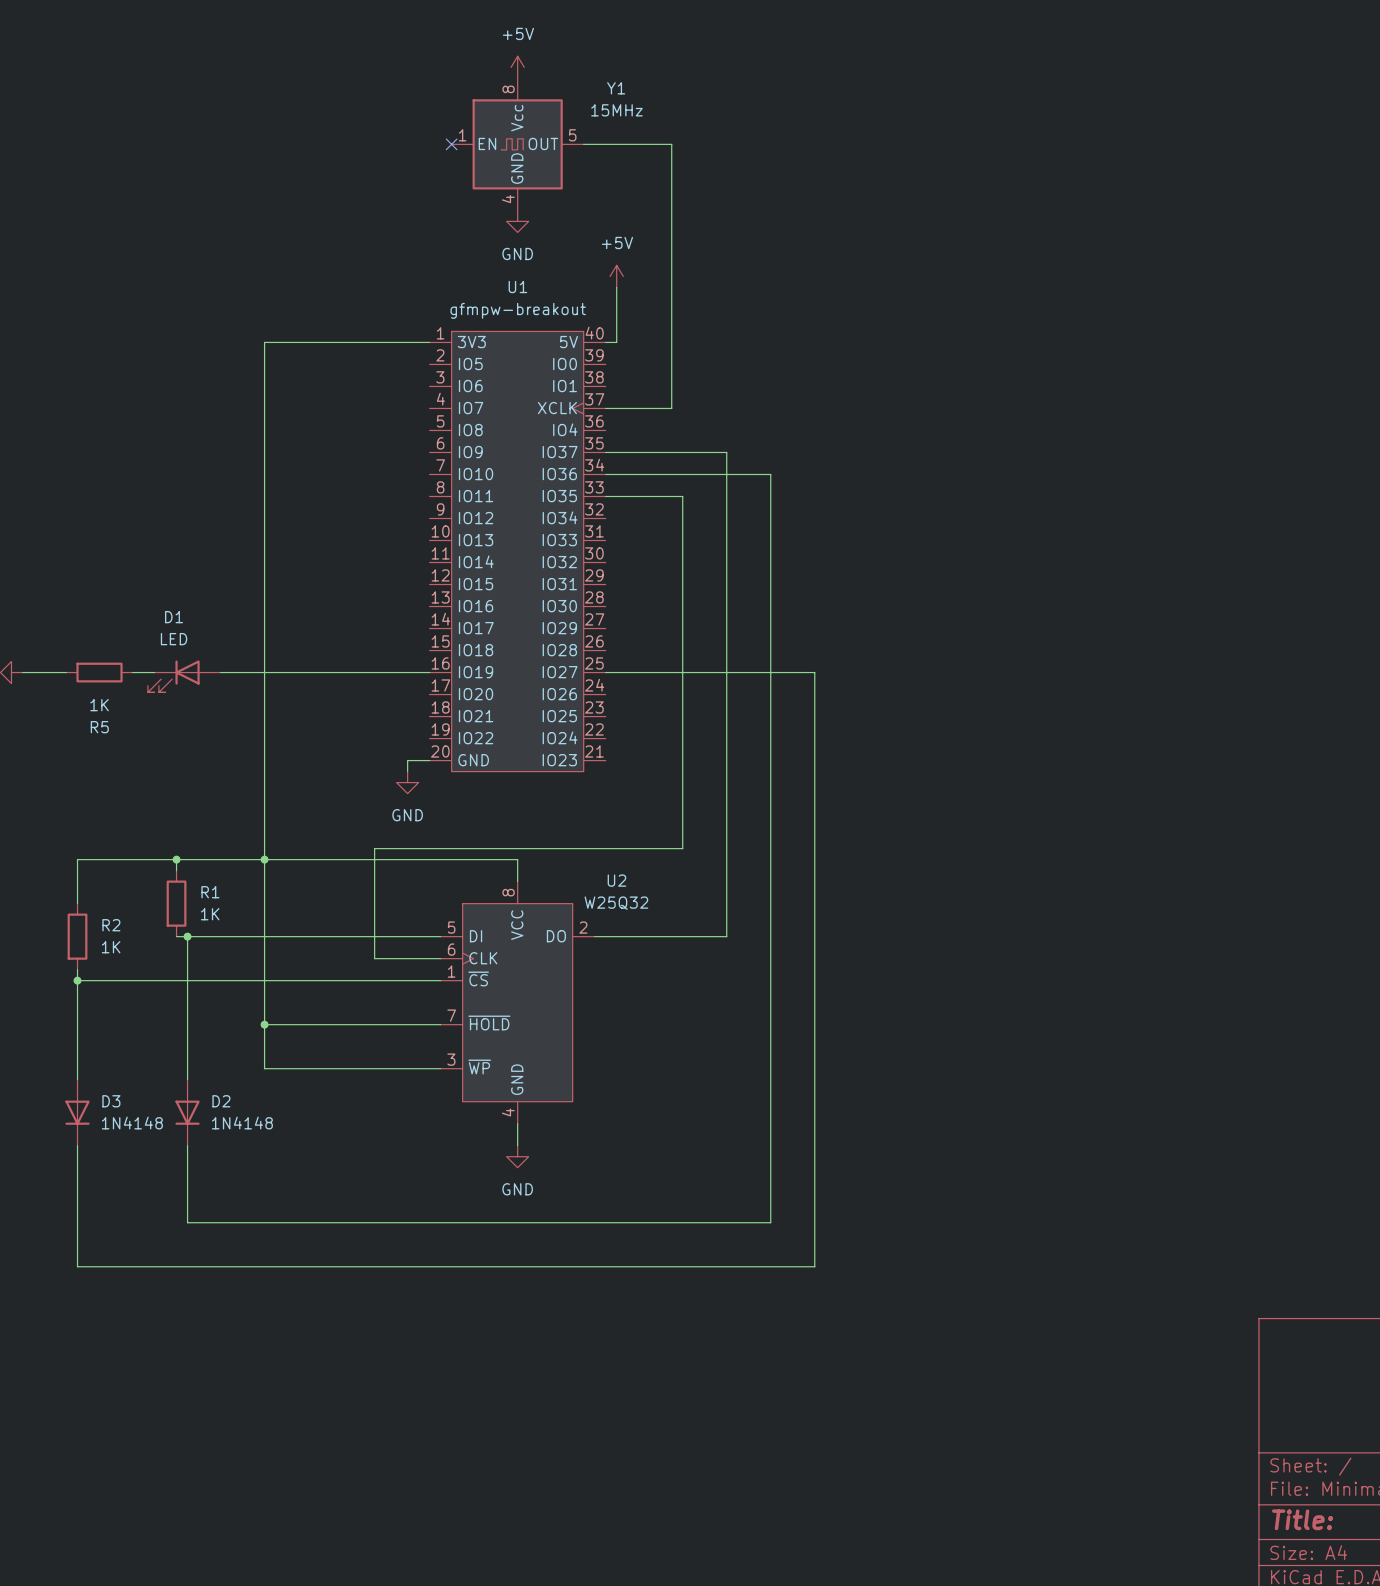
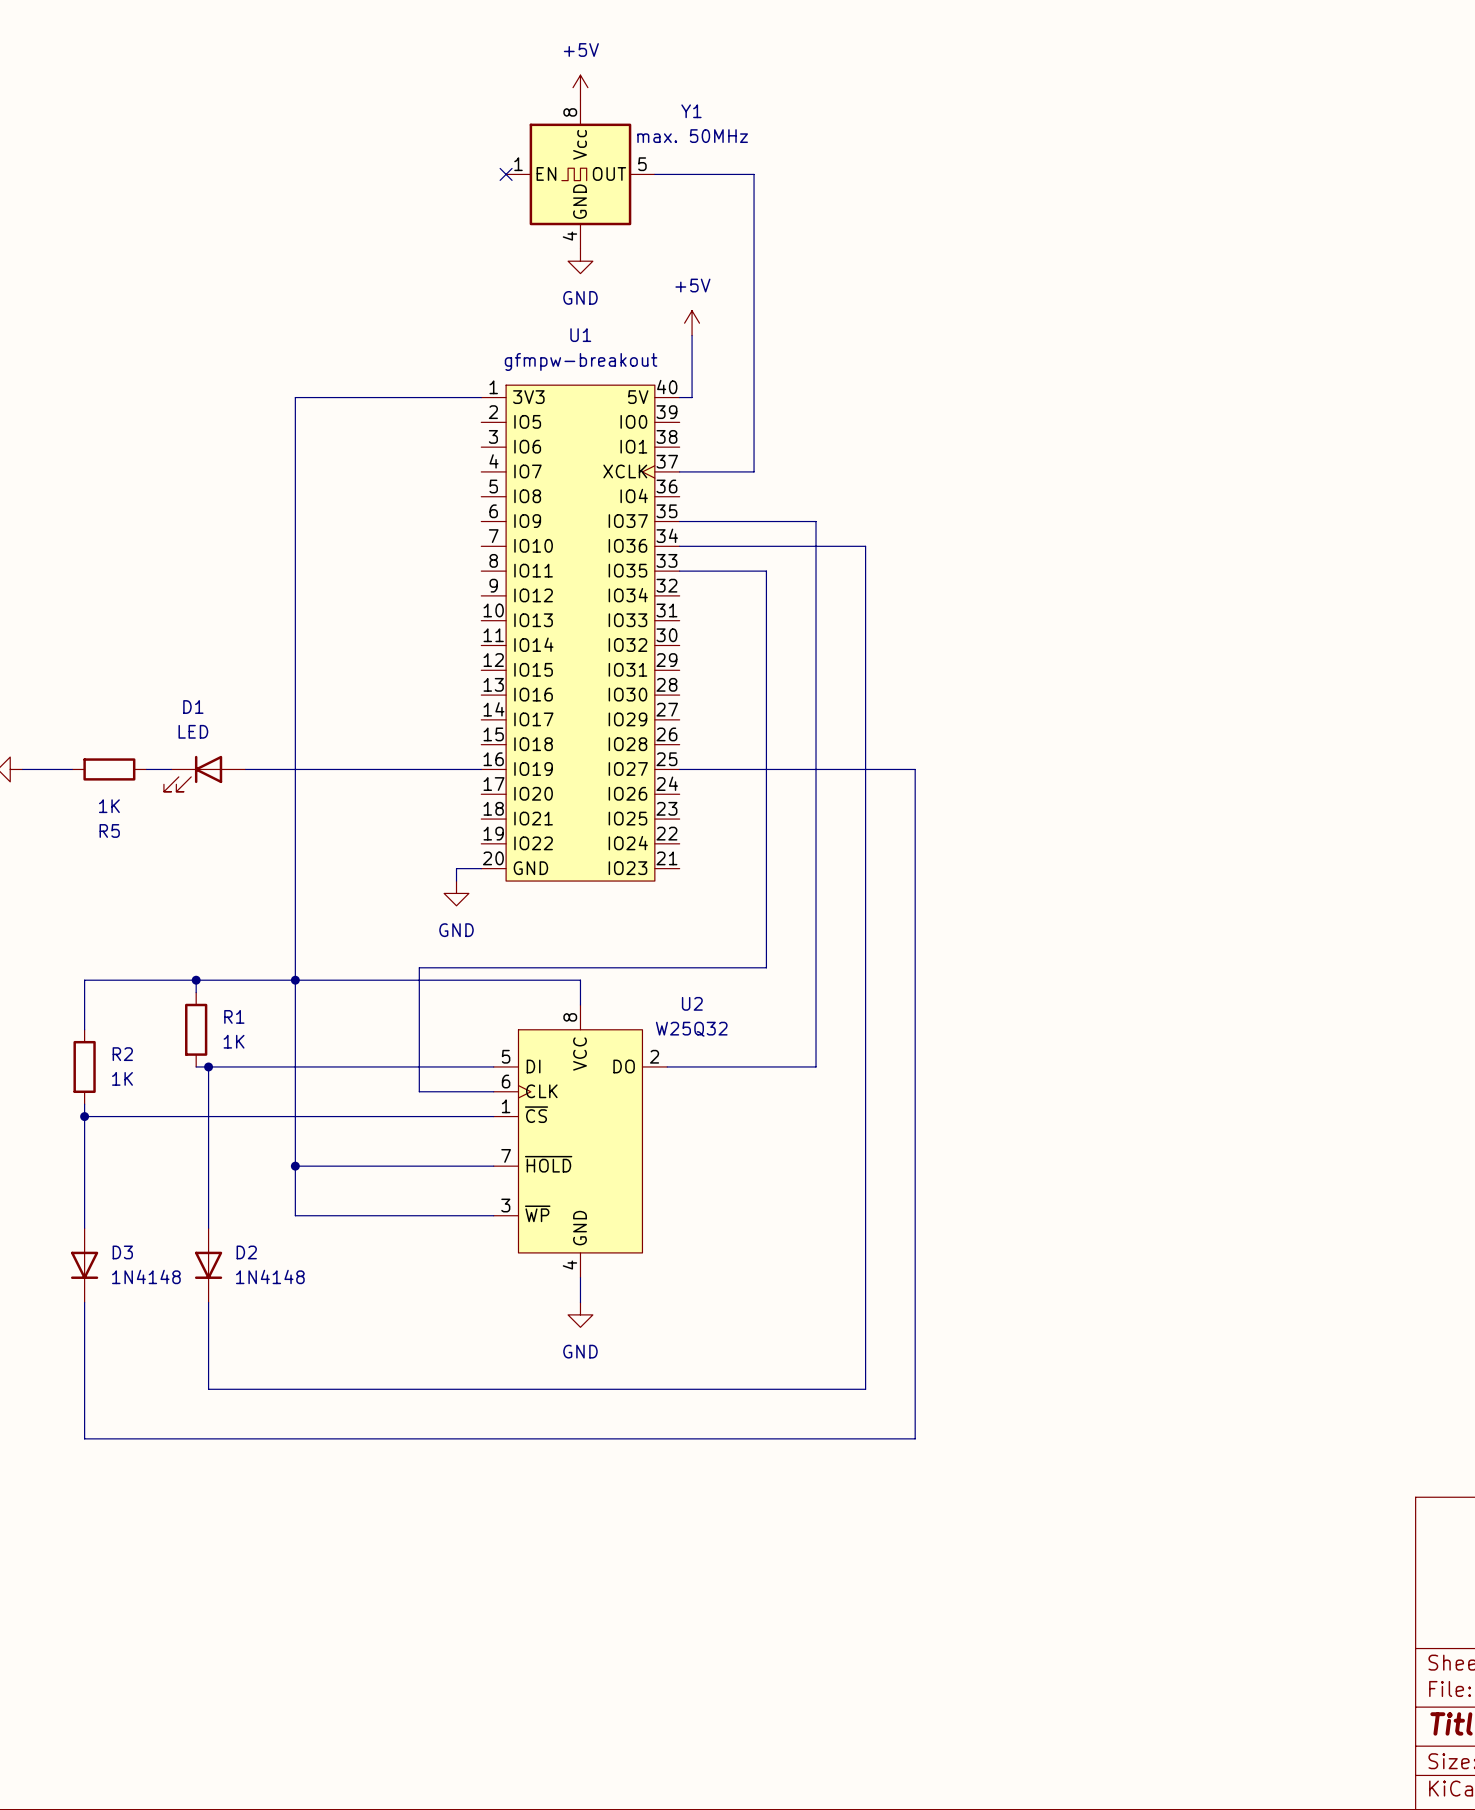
Y1 value: 15MHz (616, 110) -> max. 50MHz (692, 136)

